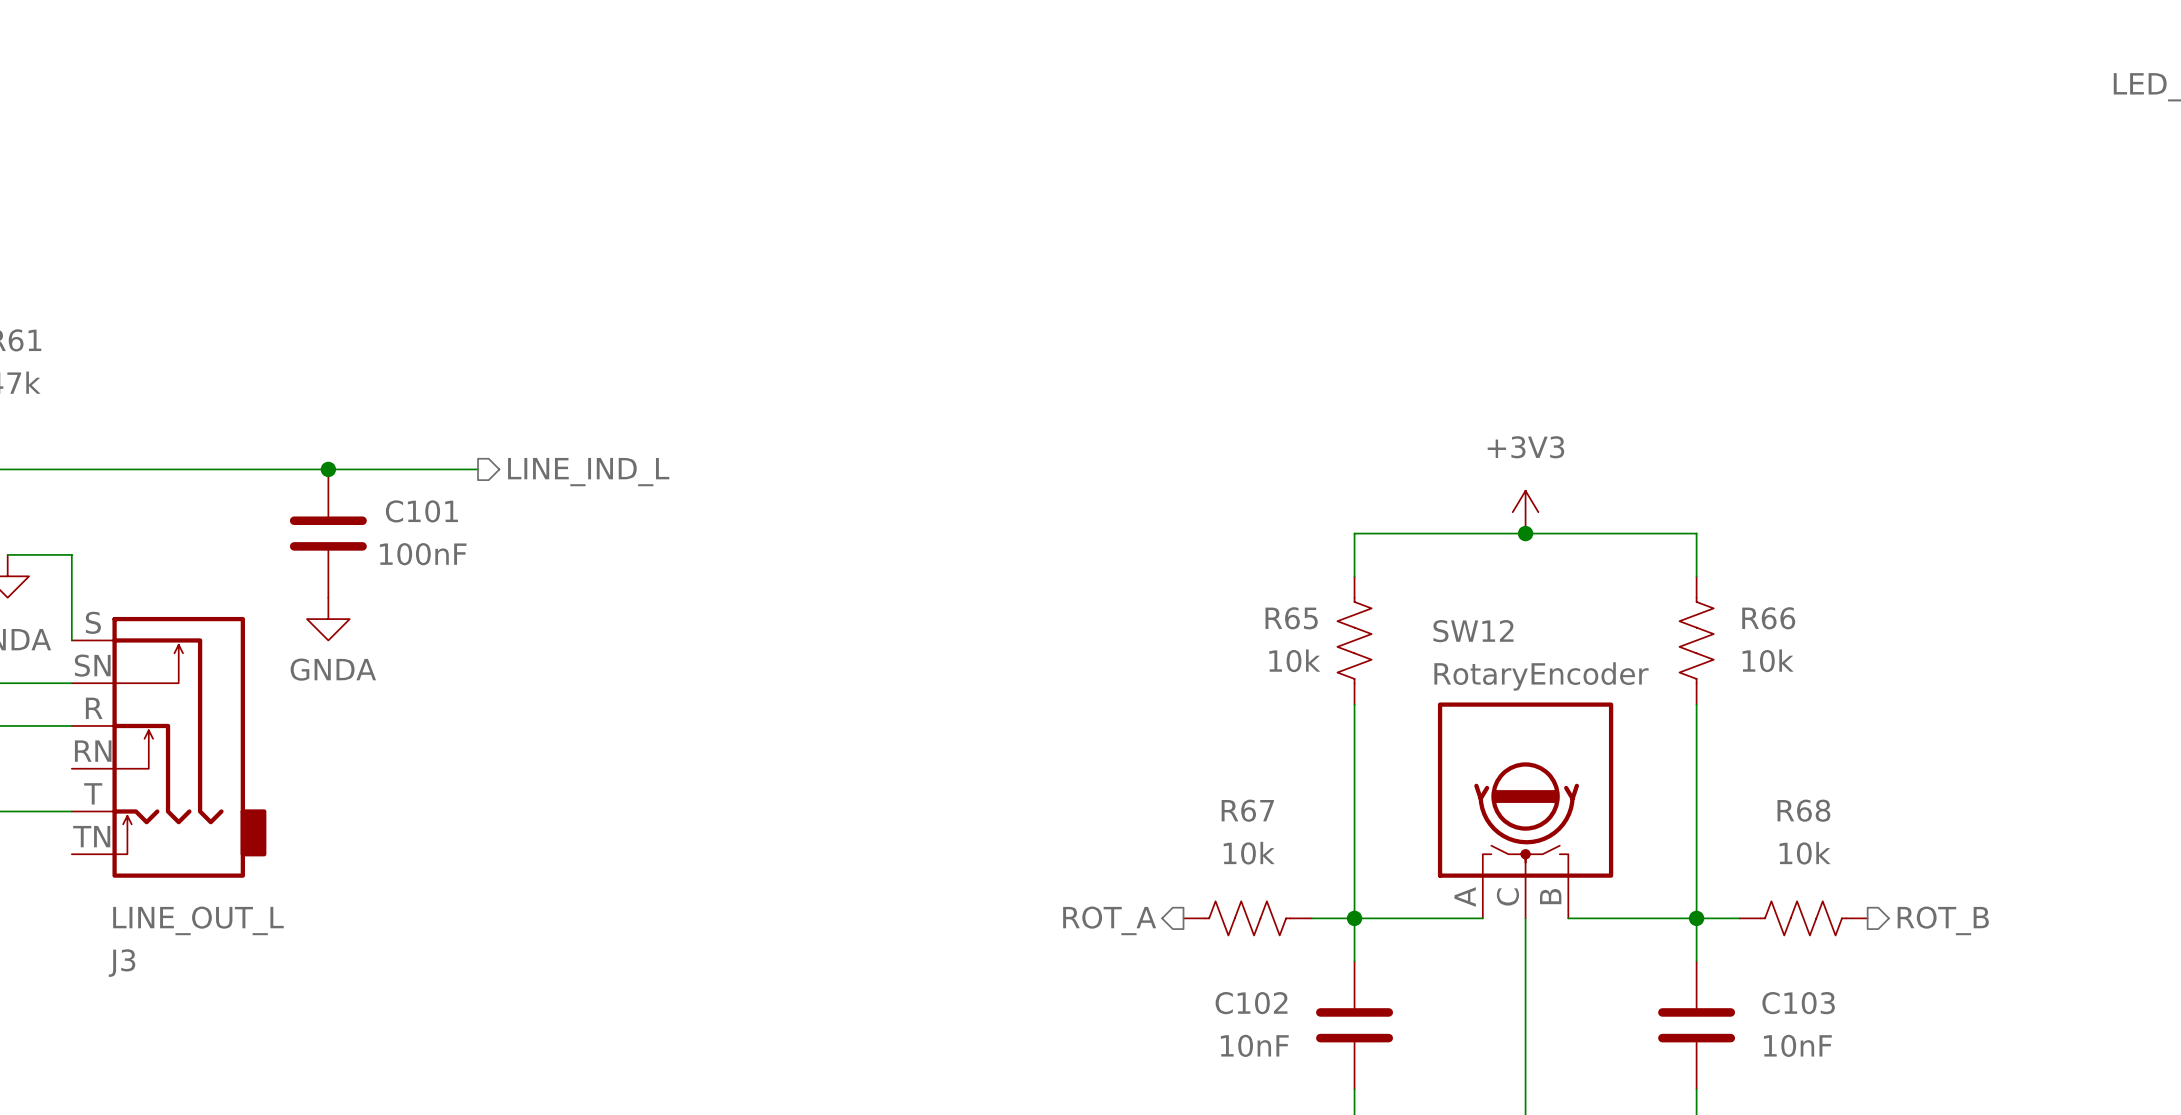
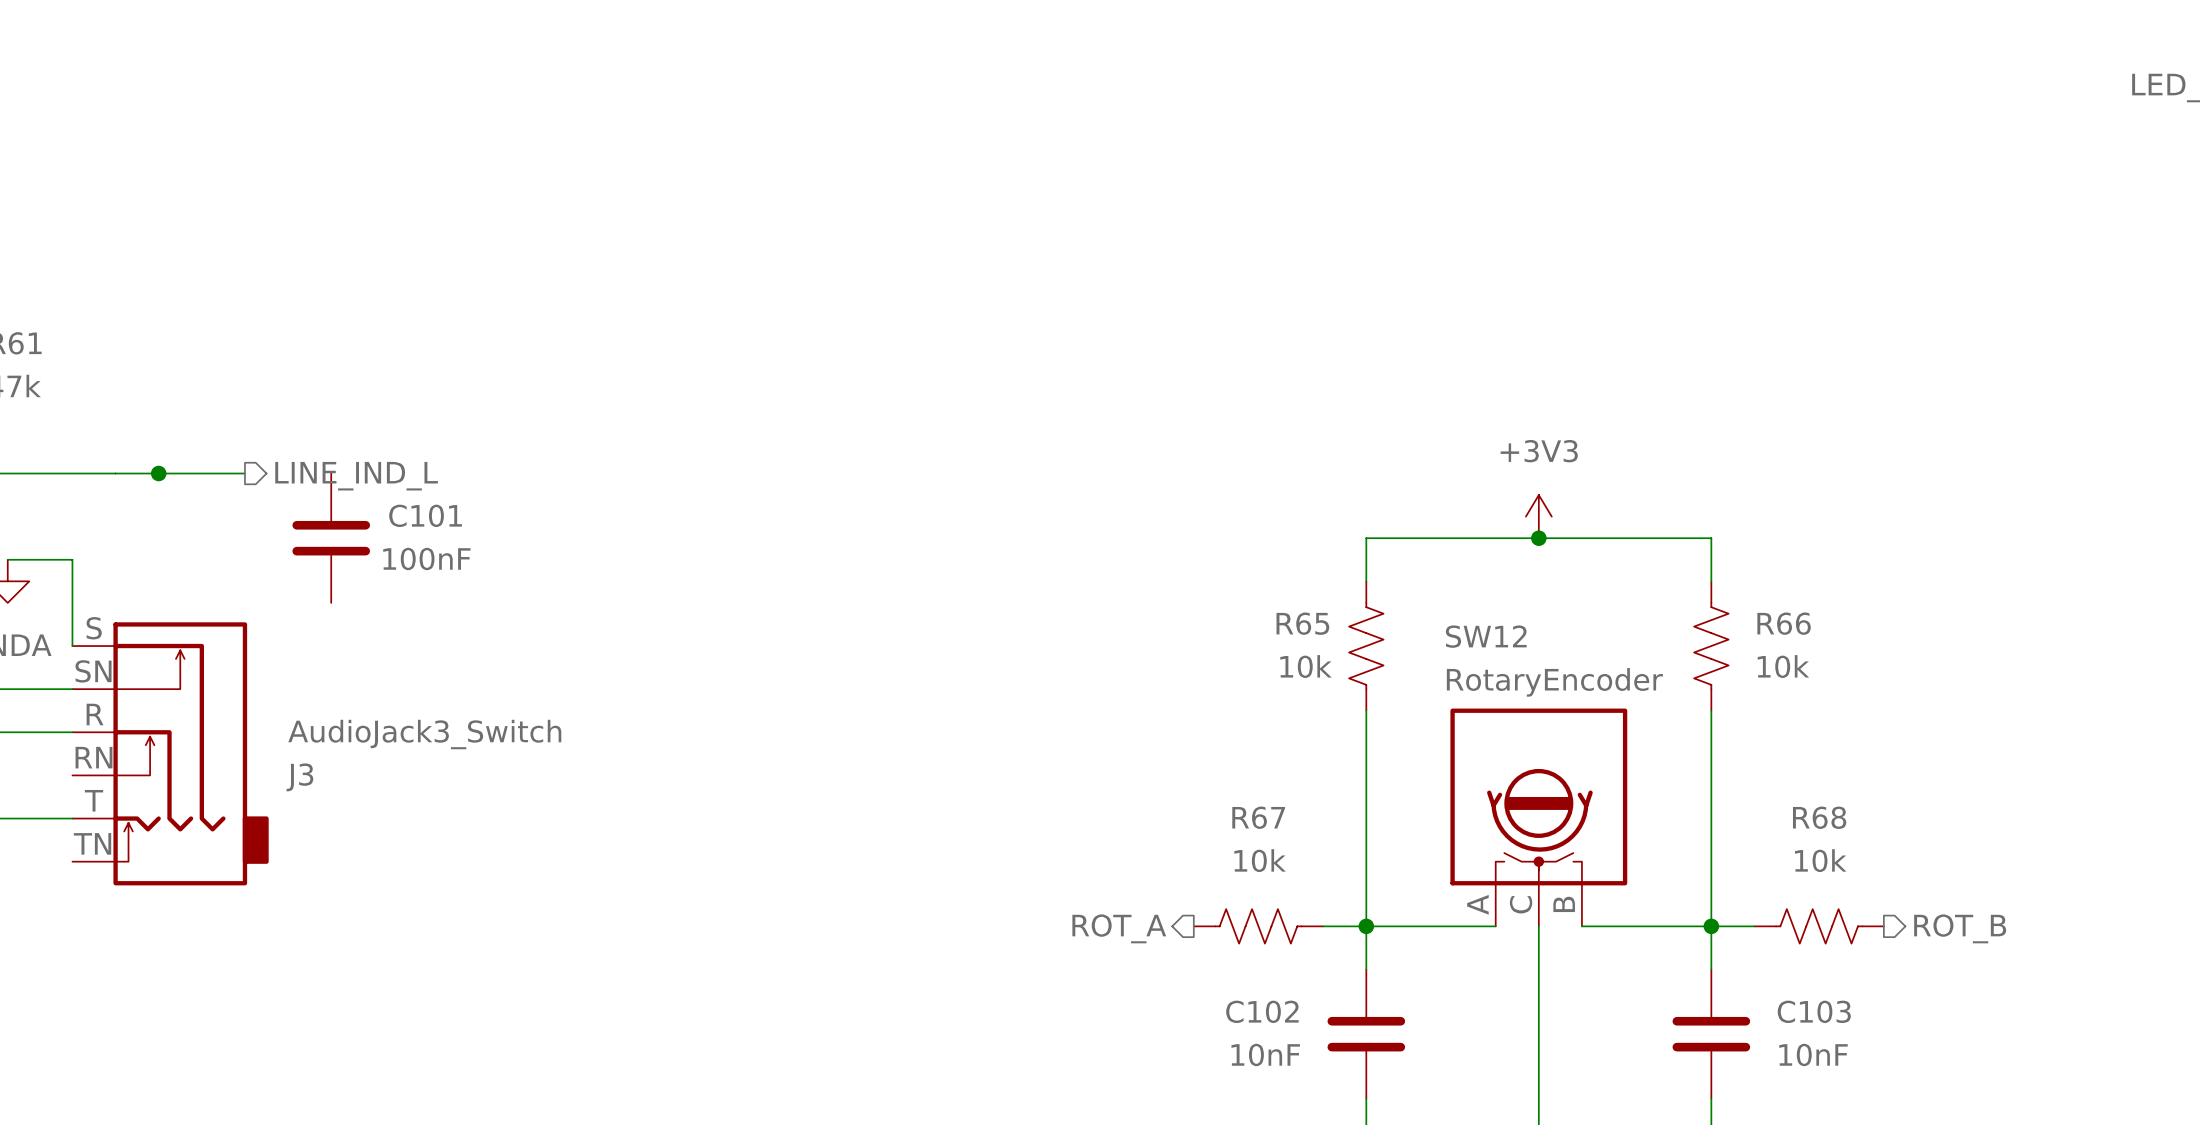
junction: none -> (158, 473)
wire: (242, 469) (478, 469) -> none
junction: (328, 469) -> none
hierarchical label position: LINE_IND_L (588, 472) -> LINE_IND_L (356, 476)
power symbol: GNDA (328, 619) -> none
J3 value: LINE_OUT_L (198, 920) -> AudioJack3_Switch (424, 734)
J3 name position: J3 (122, 963) -> J3 (299, 777)

